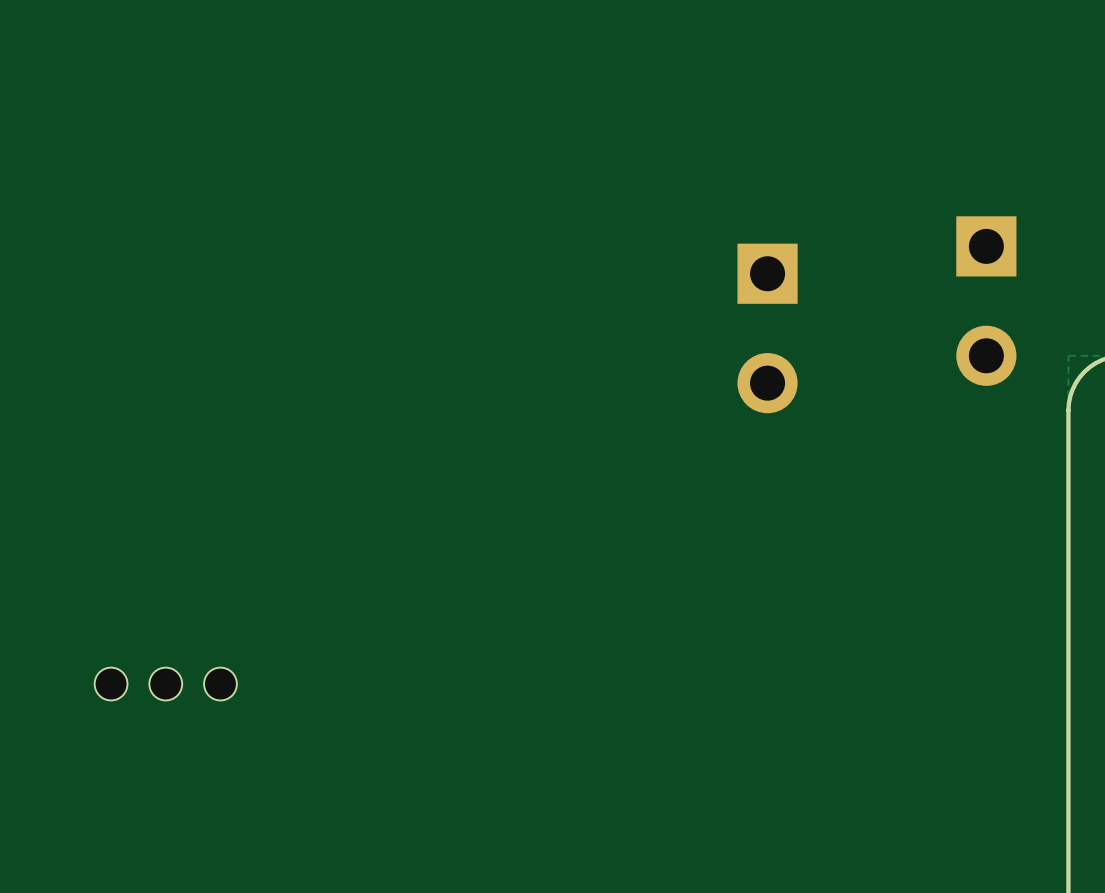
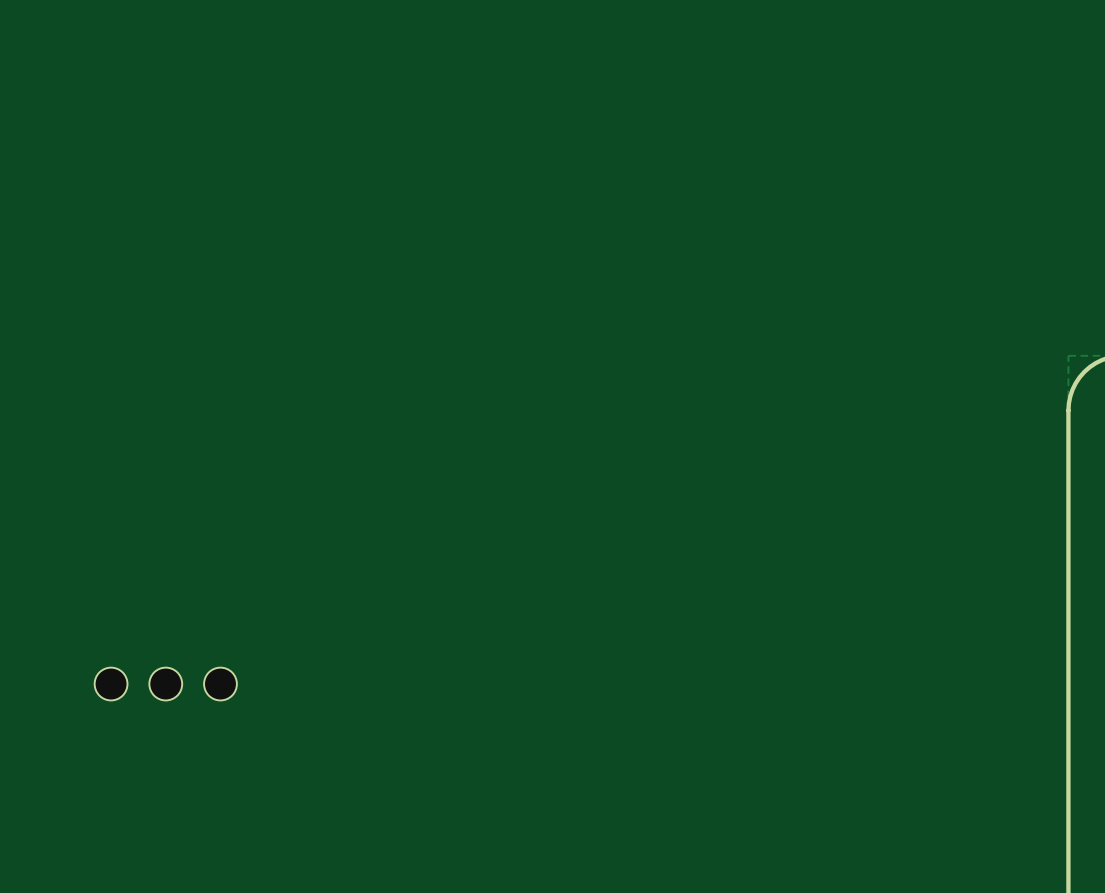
part: (986, 301) -> none
part: (767, 328) -> none

